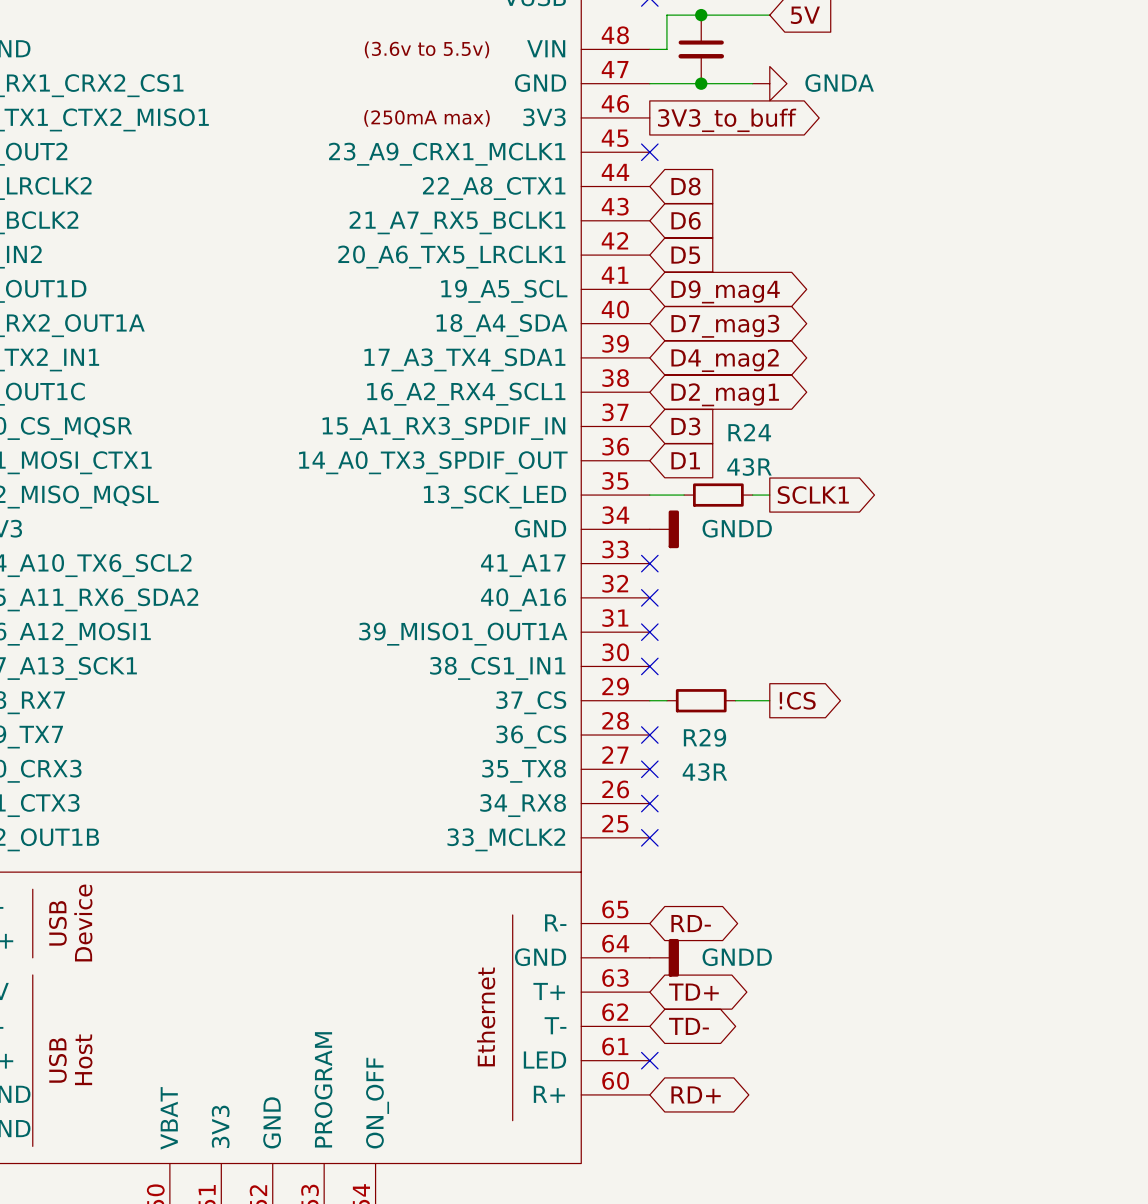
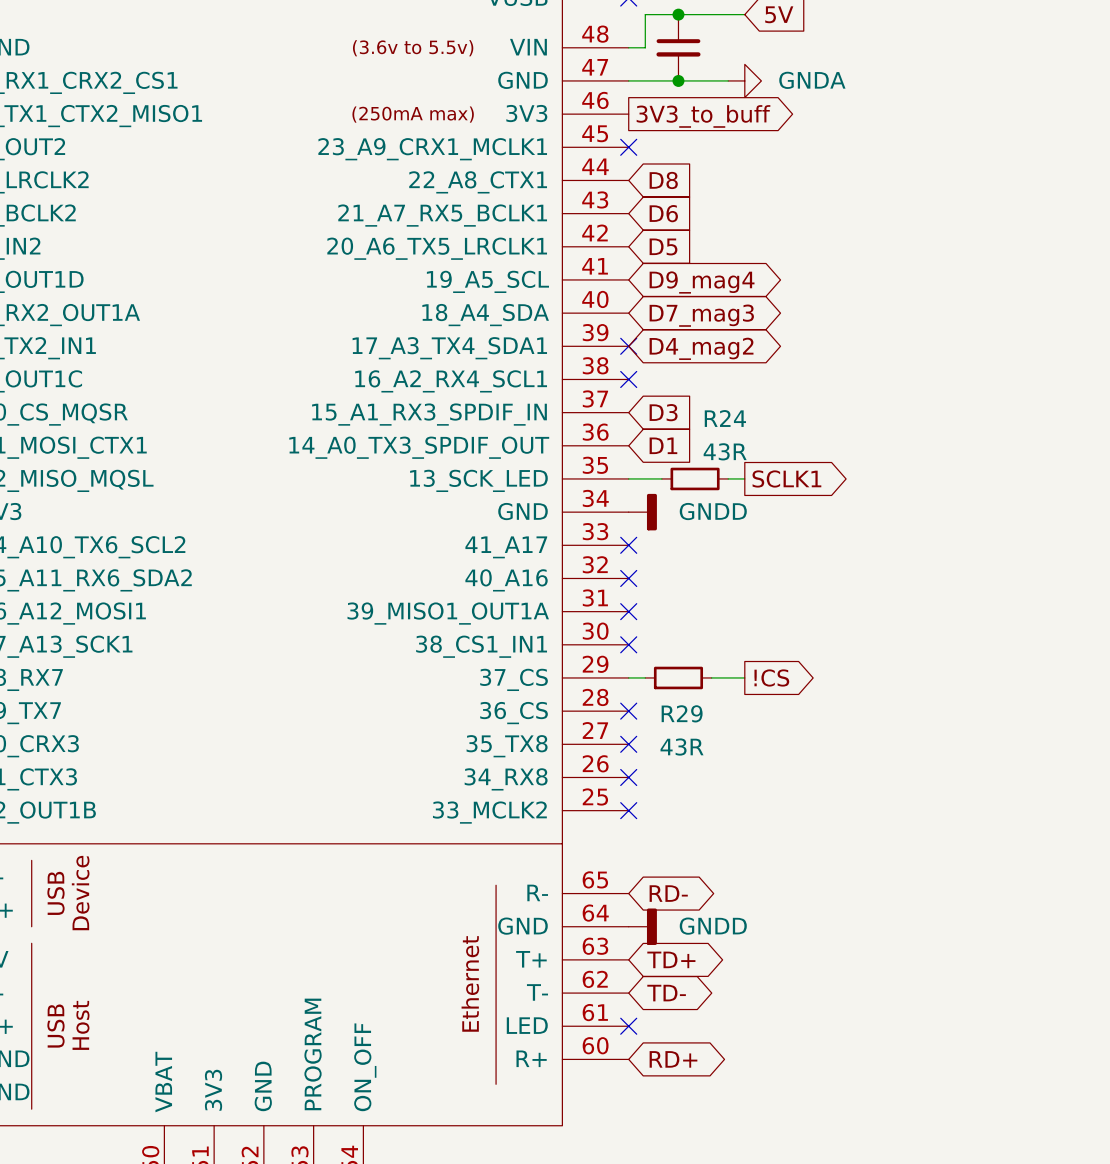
no-connect mark: none -> (628, 346)
no-connect mark: none -> (628, 379)
global label: D2_mag1 (725, 394) -> none

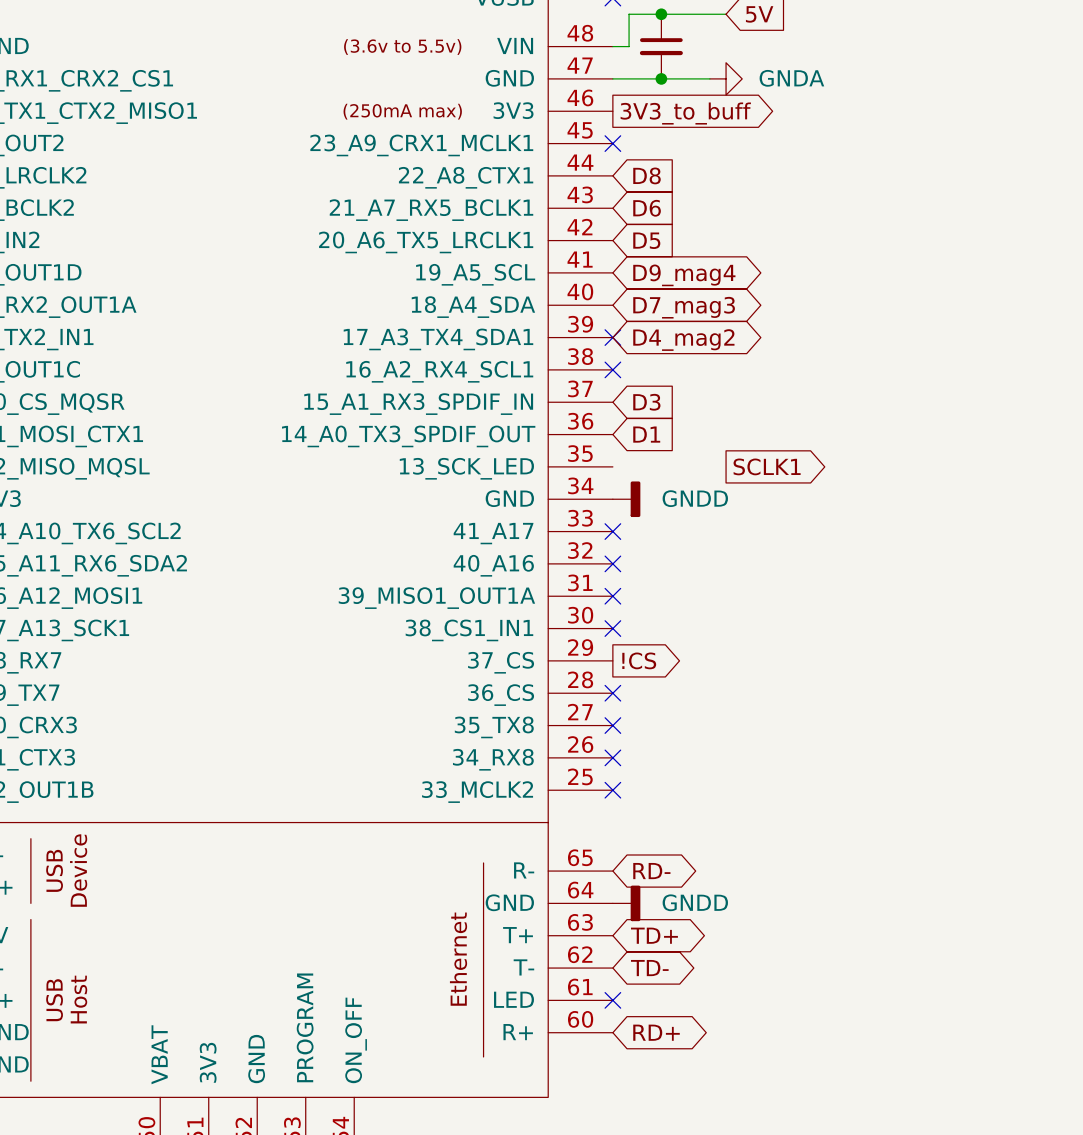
wire: (628, 478) (661, 478) -> none
R24: 43R (695, 478) -> none
wire: (728, 478) (744, 478) -> none
wire: (628, 677) (645, 677) -> none
R29: 43R (678, 677) -> none
wire: (711, 677) (744, 677) -> none
global label position: !CS (771, 677) -> !CS (639, 660)

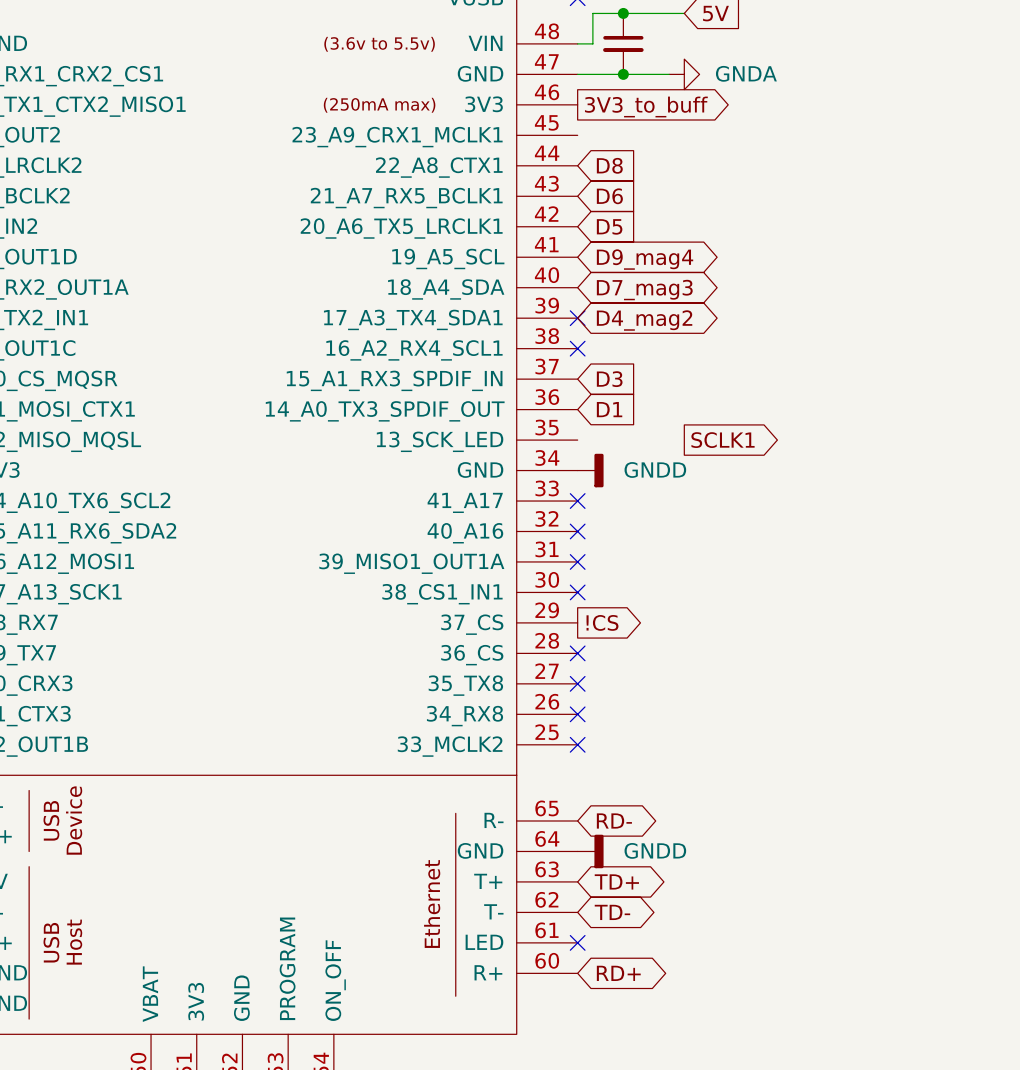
no-connect mark: (612, 143) -> none

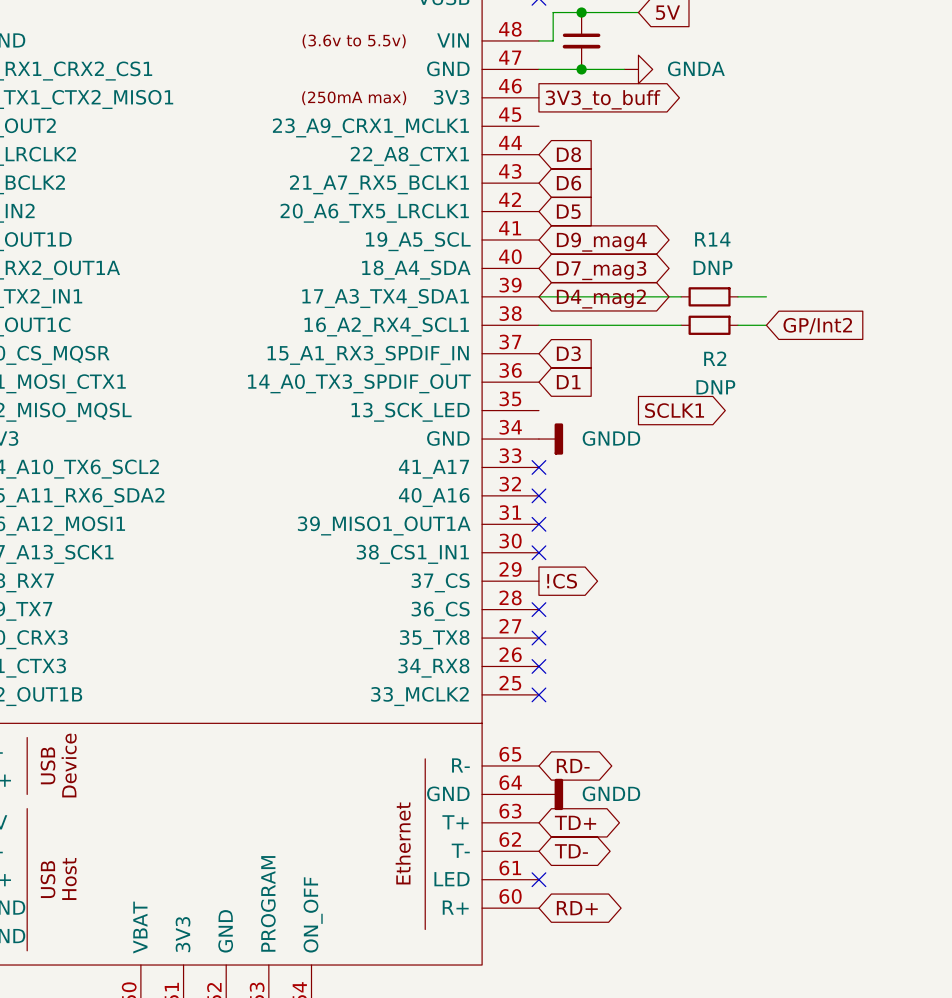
wire: none -> (538, 296) (681, 296)
no-connect mark: (577, 318) -> none
R14: none -> DNP (709, 296)
wire: none -> (737, 296) (766, 296)
wire: none -> (538, 325) (681, 325)
no-connect mark: (577, 348) -> none
R2: none -> DNP (709, 325)
wire: none -> (737, 325) (766, 325)
global label: none -> GP/Int2 (817, 326)

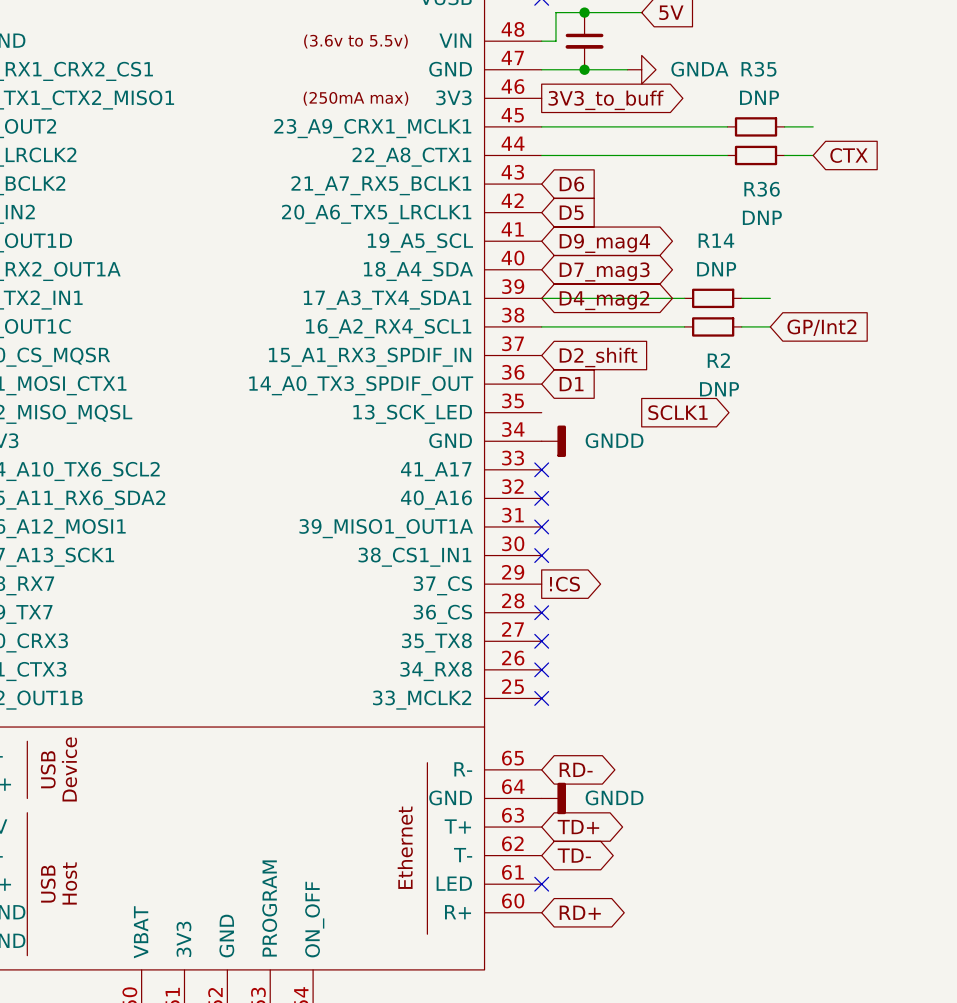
wire: none -> (541, 126) (727, 126)
R35: none -> DNP (756, 126)
wire: none -> (784, 126) (813, 126)
wire: none -> (541, 155) (727, 155)
global label: D8 (568, 154) -> none
R36: none -> DNP (756, 155)
wire: none -> (784, 155) (813, 155)
global label: none -> CTX (849, 155)
global label: D3 (568, 353) -> D2_shift (598, 357)

